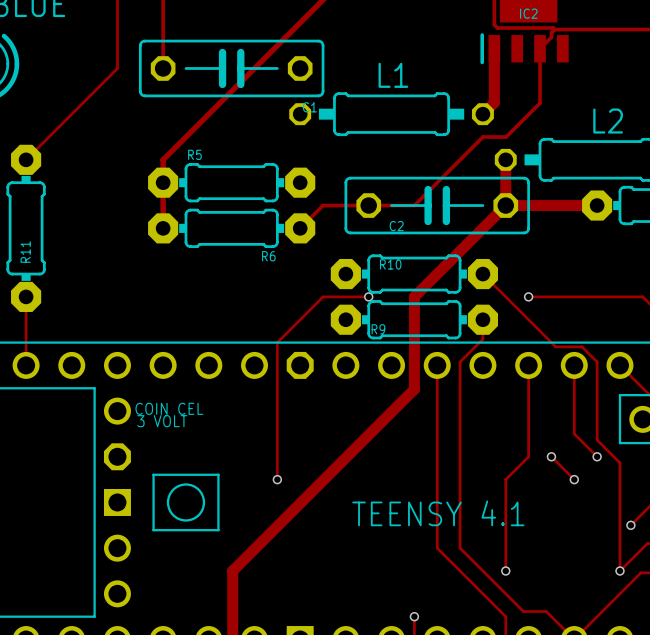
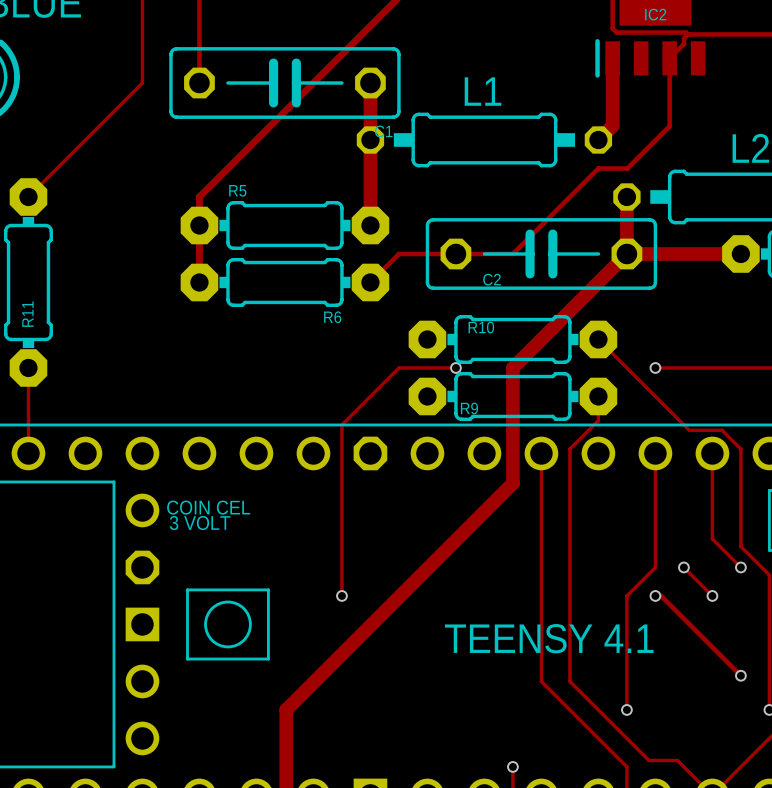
track: none -> (370, 83) (370, 225)
track: none -> (655, 595) (661, 595) (740, 675)
via: none -> (655, 595)
via: none -> (740, 675)

